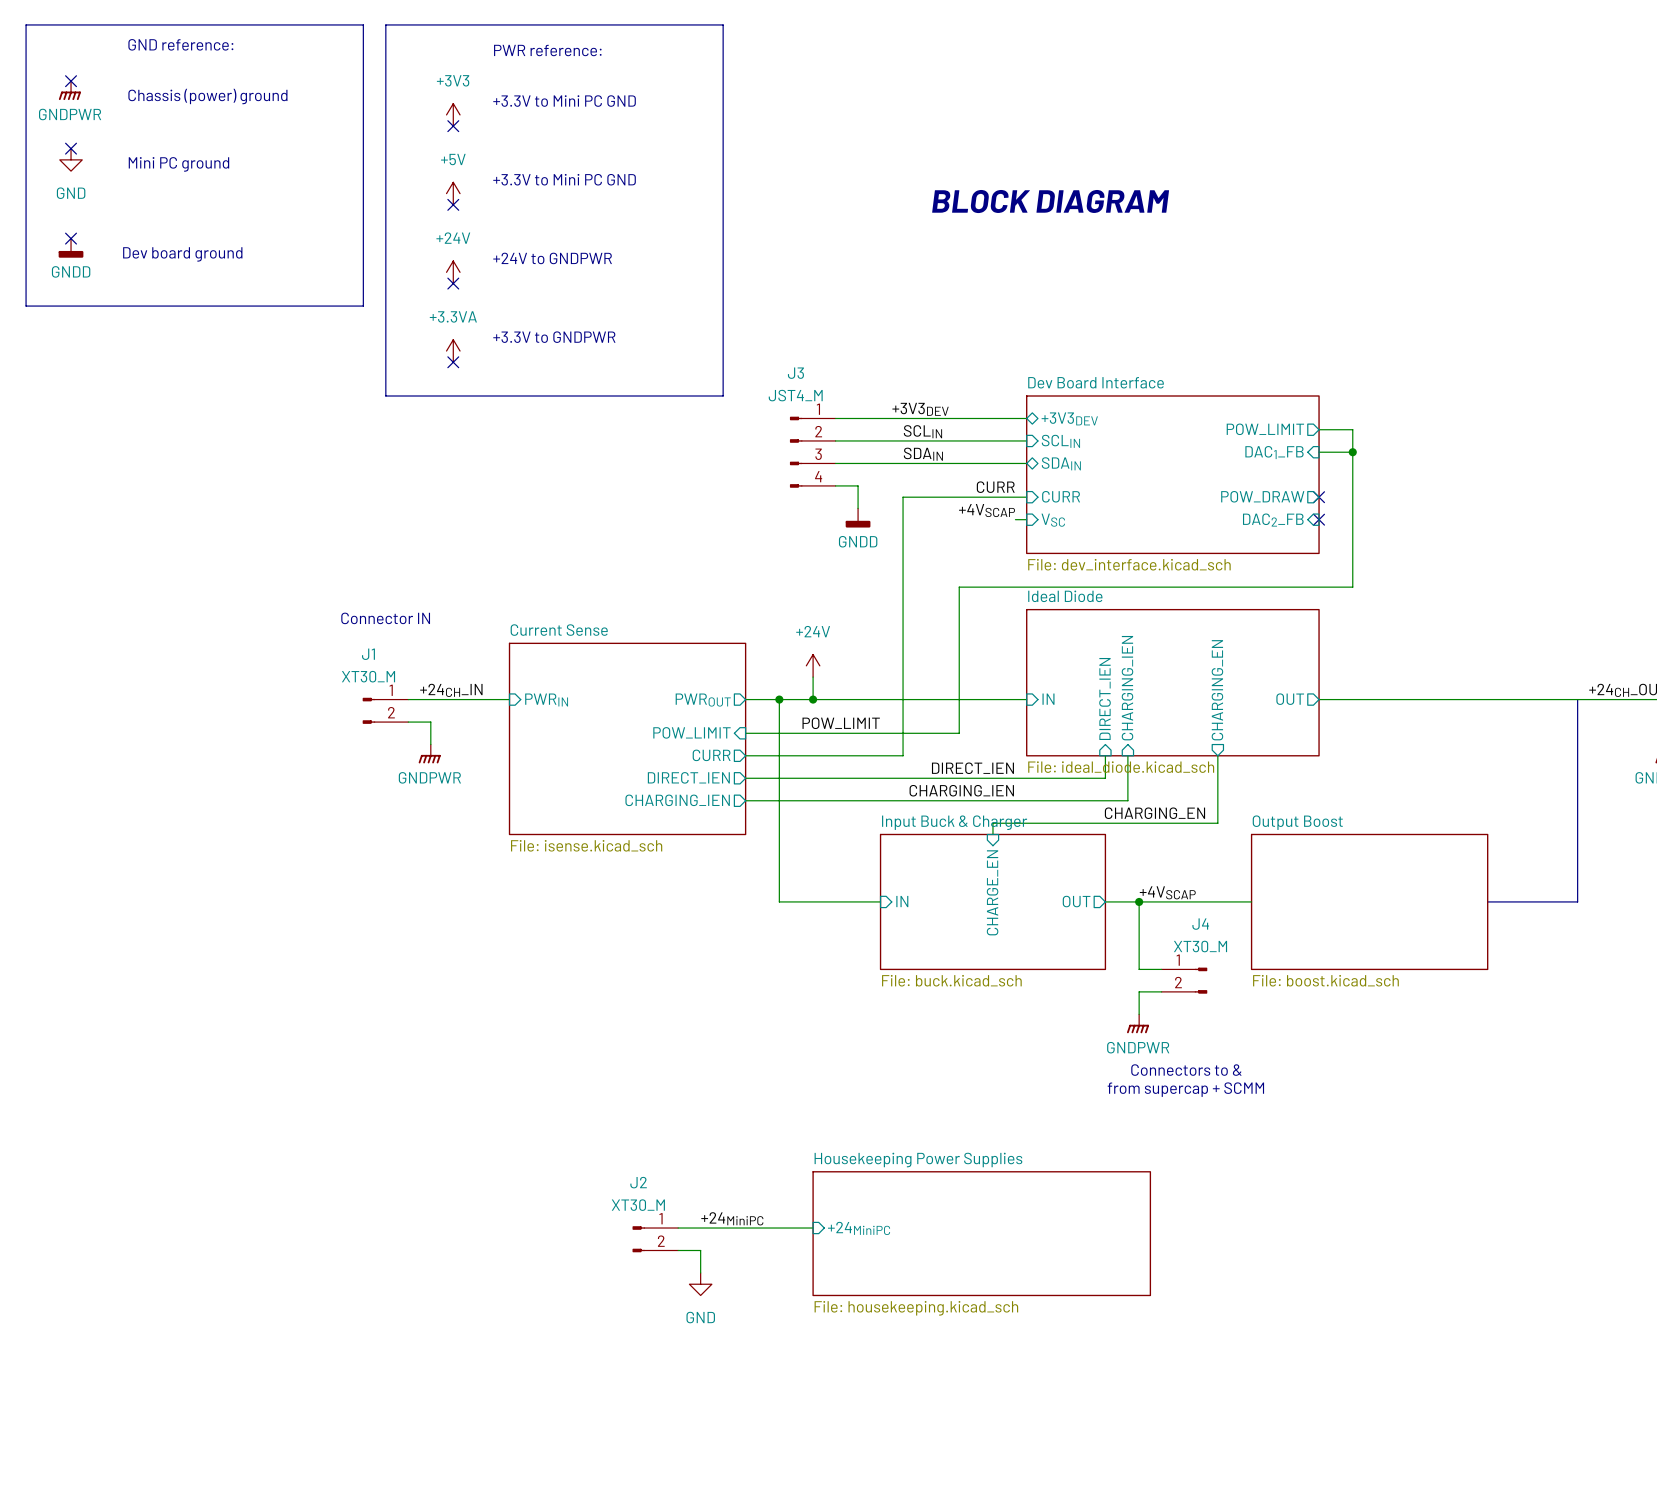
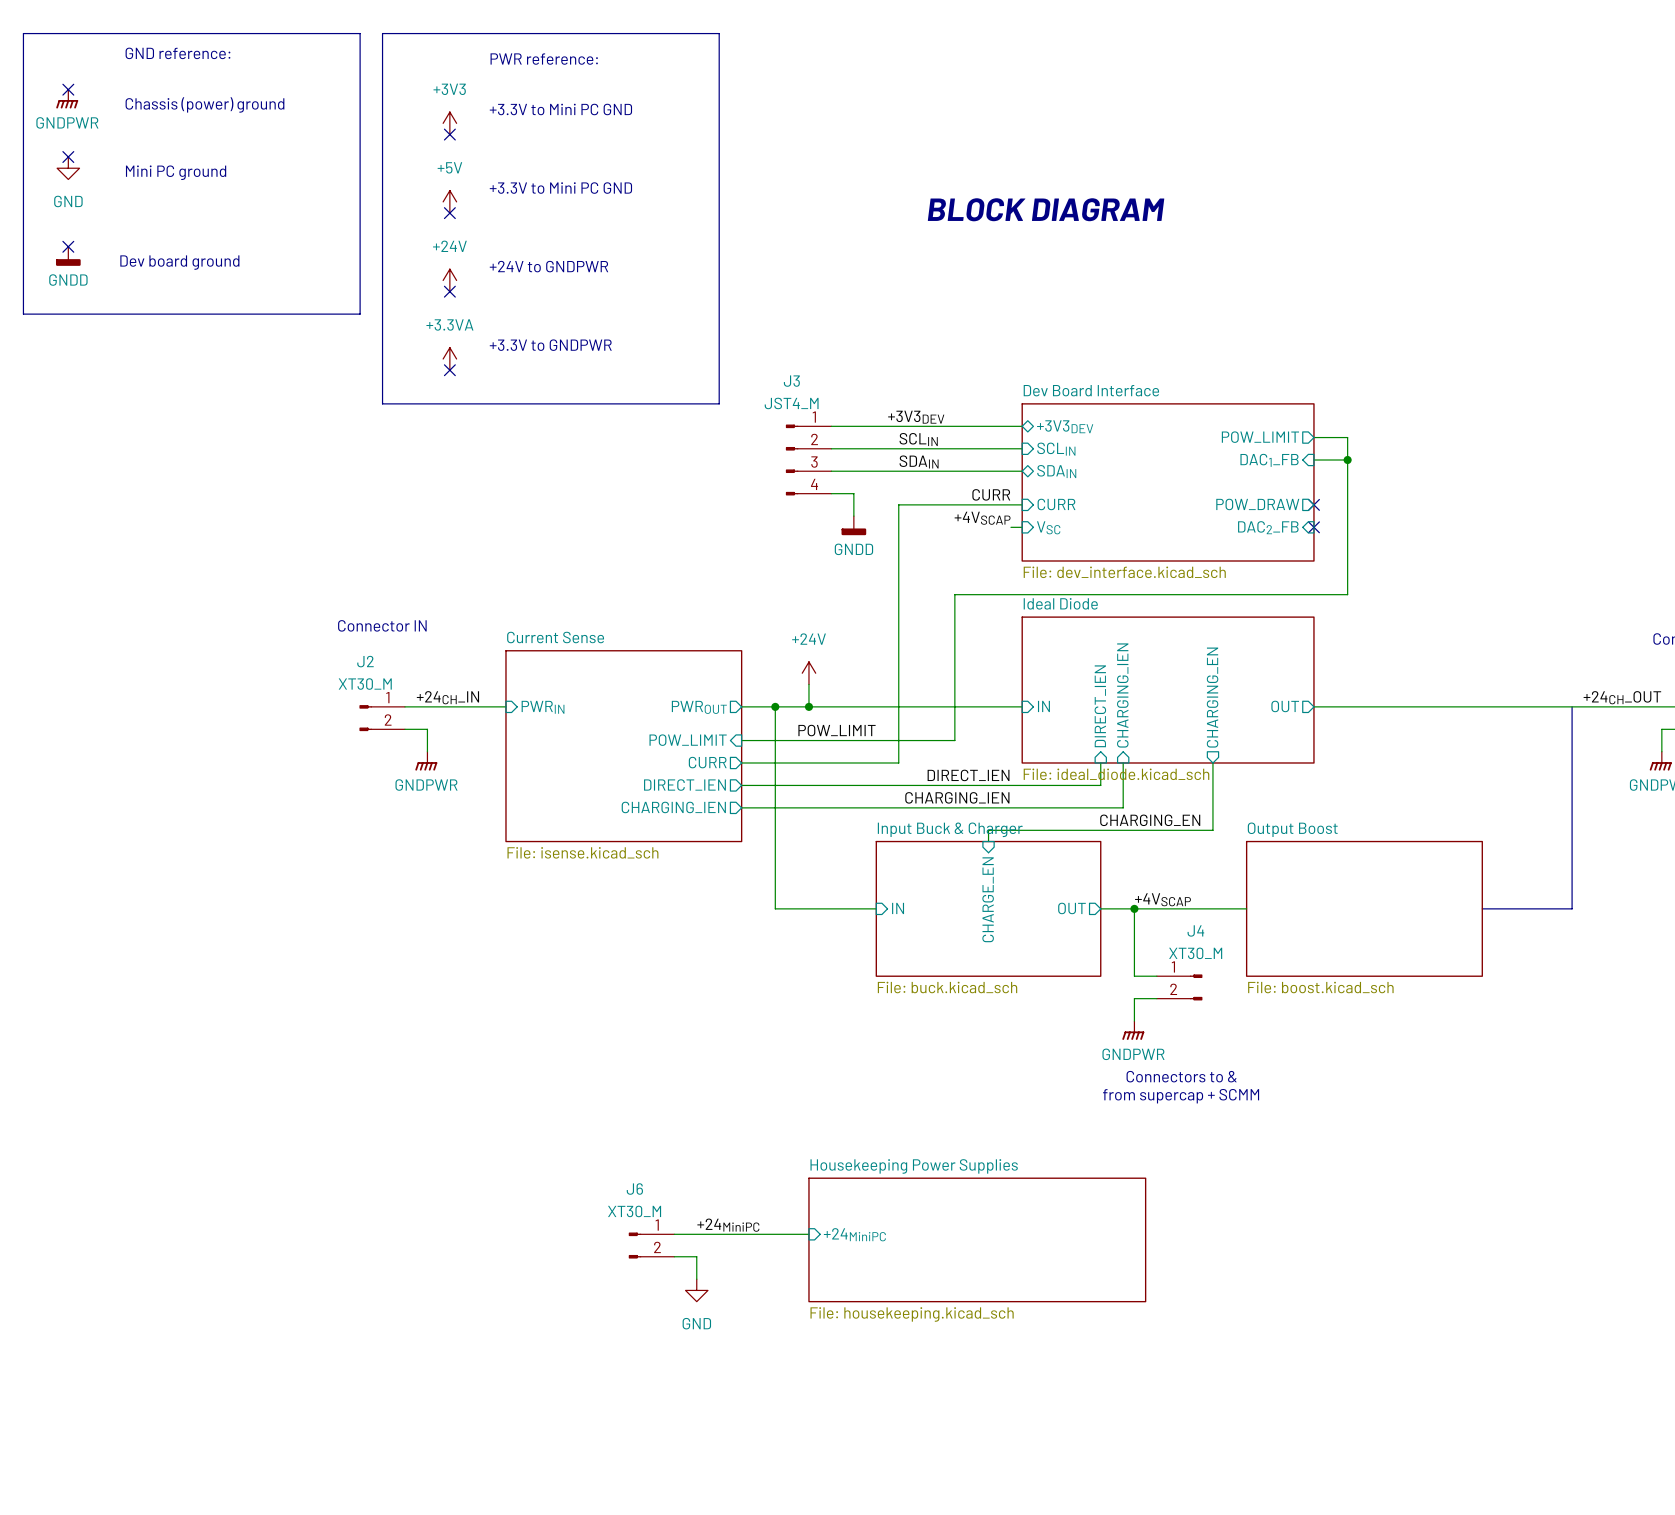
J1 name: J1 (368, 654) -> J2 (365, 661)
J2 name: J2 (638, 1182) -> J6 (634, 1189)

